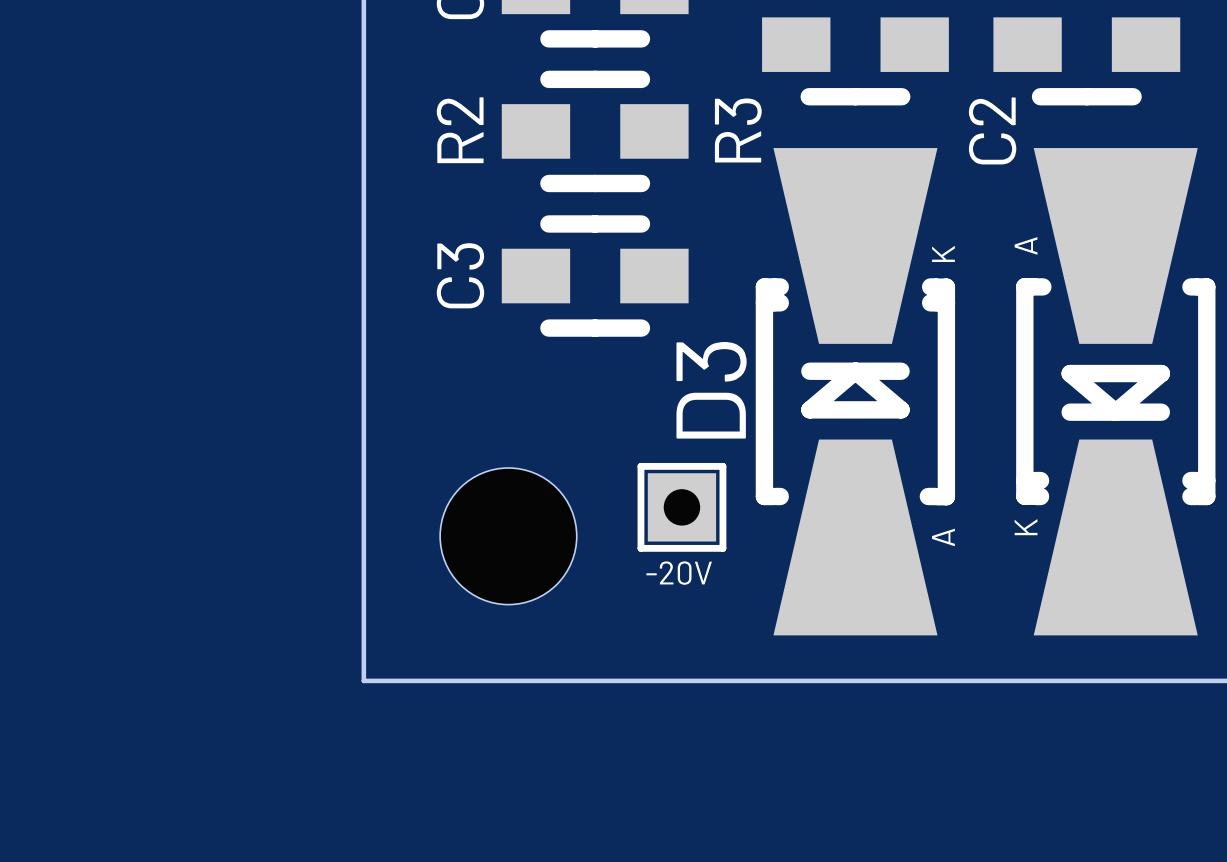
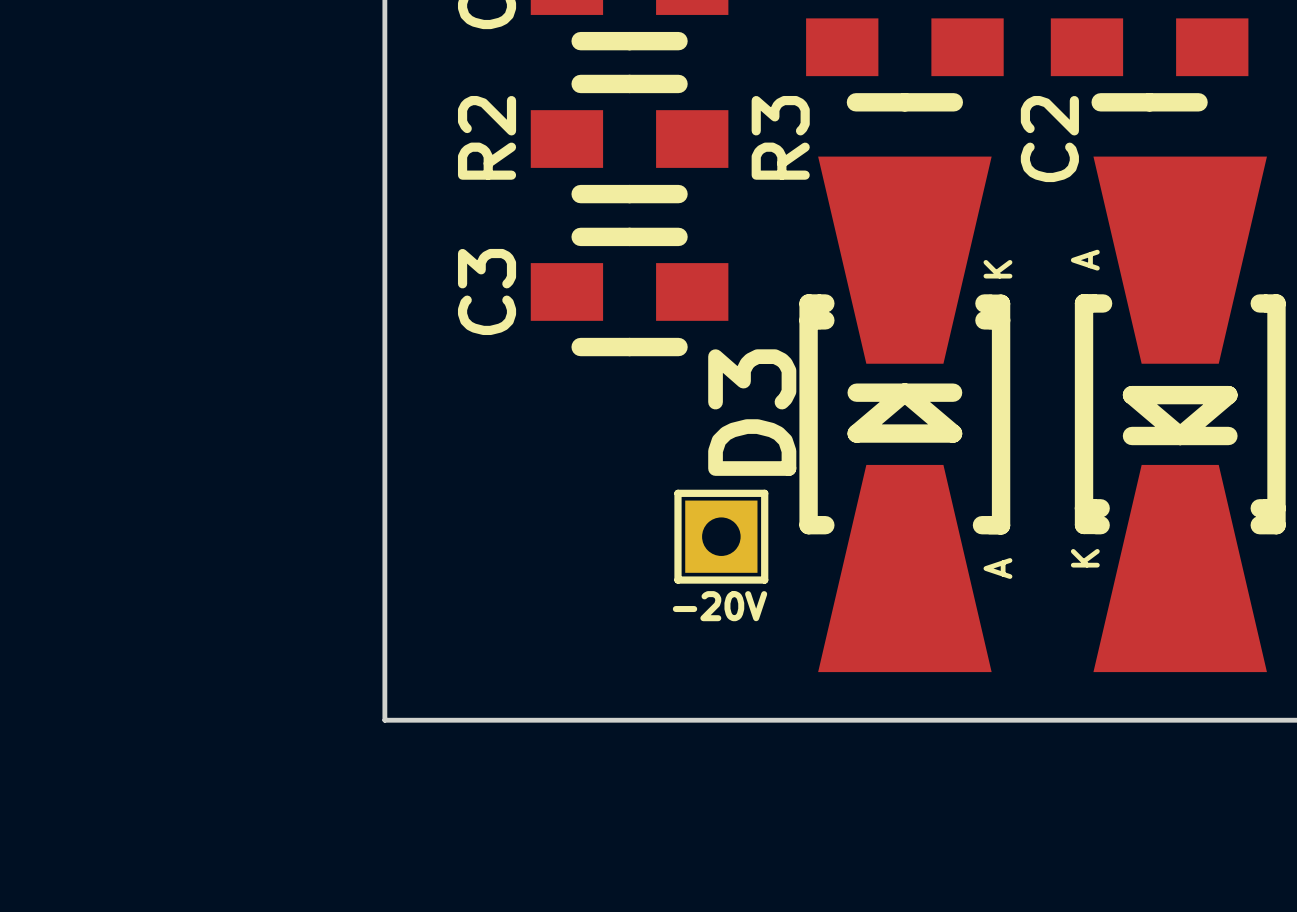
part: (508, 536) -> none

